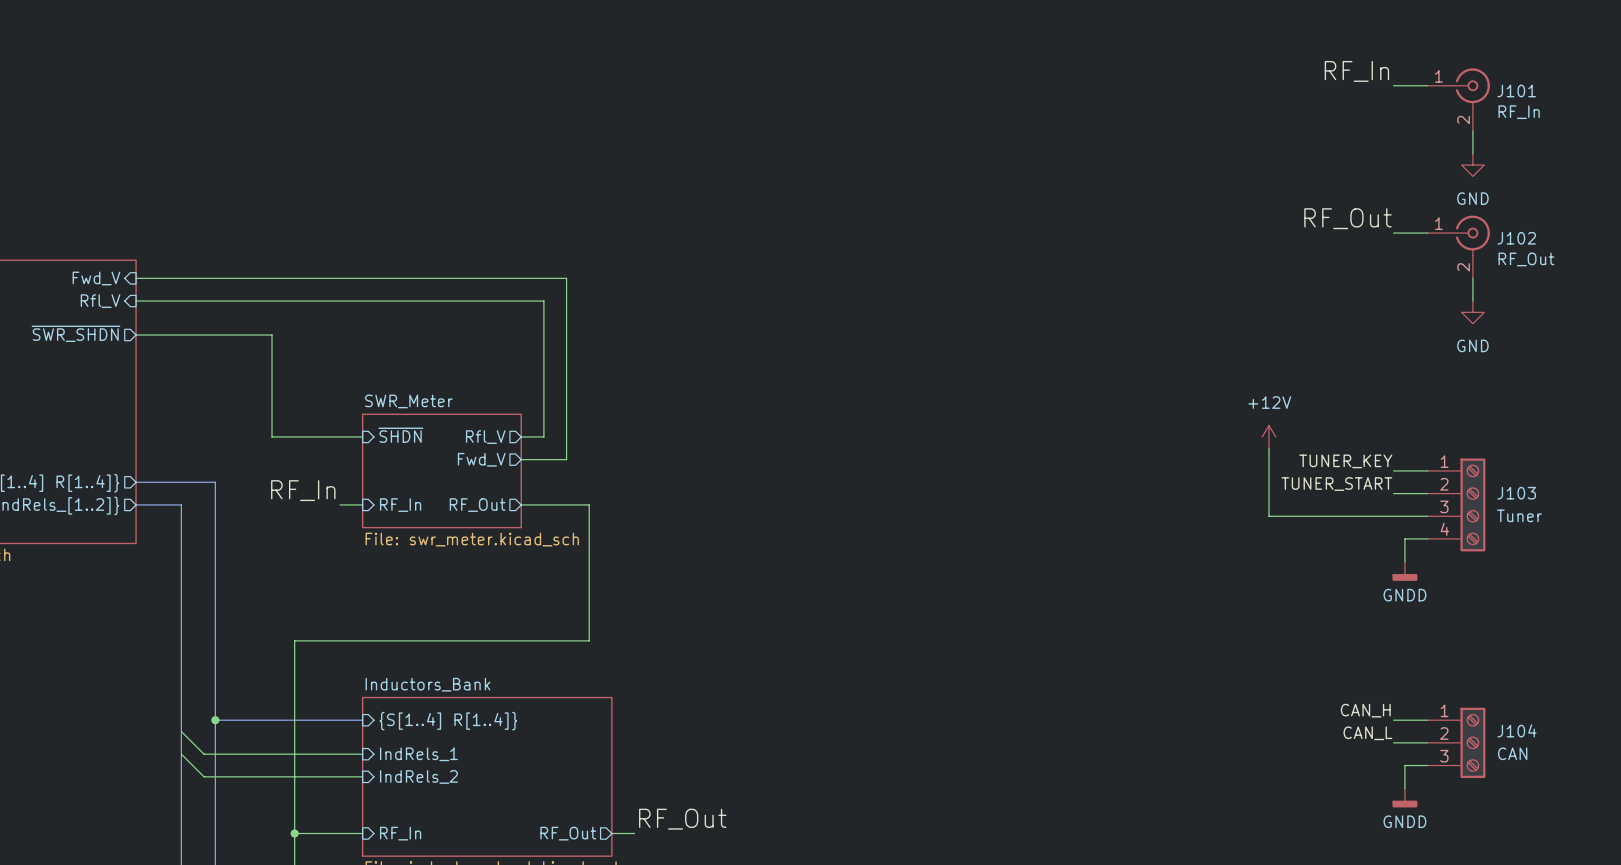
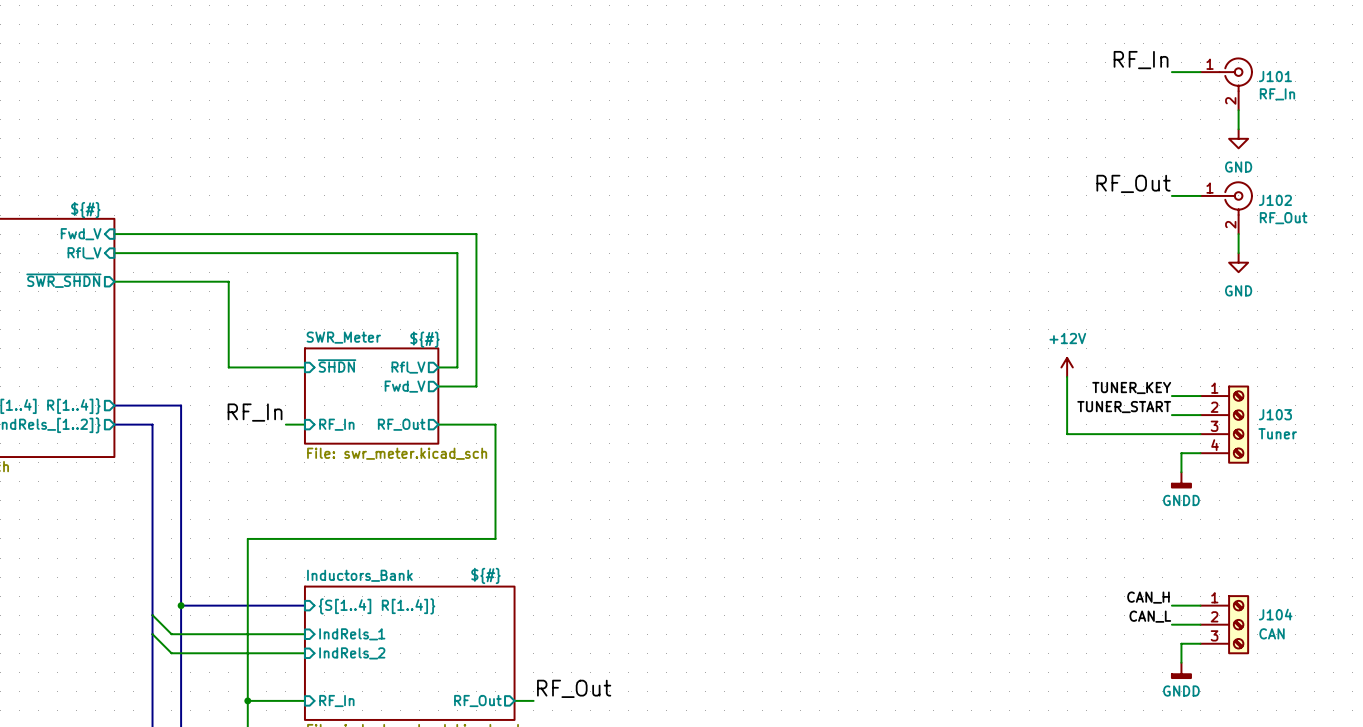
sheet text: none -> ${#} (85, 210)
sheet SWR_Meter text: none -> ${#} (424, 339)
sheet Inductors_Bank text: none -> ${#} (485, 575)

